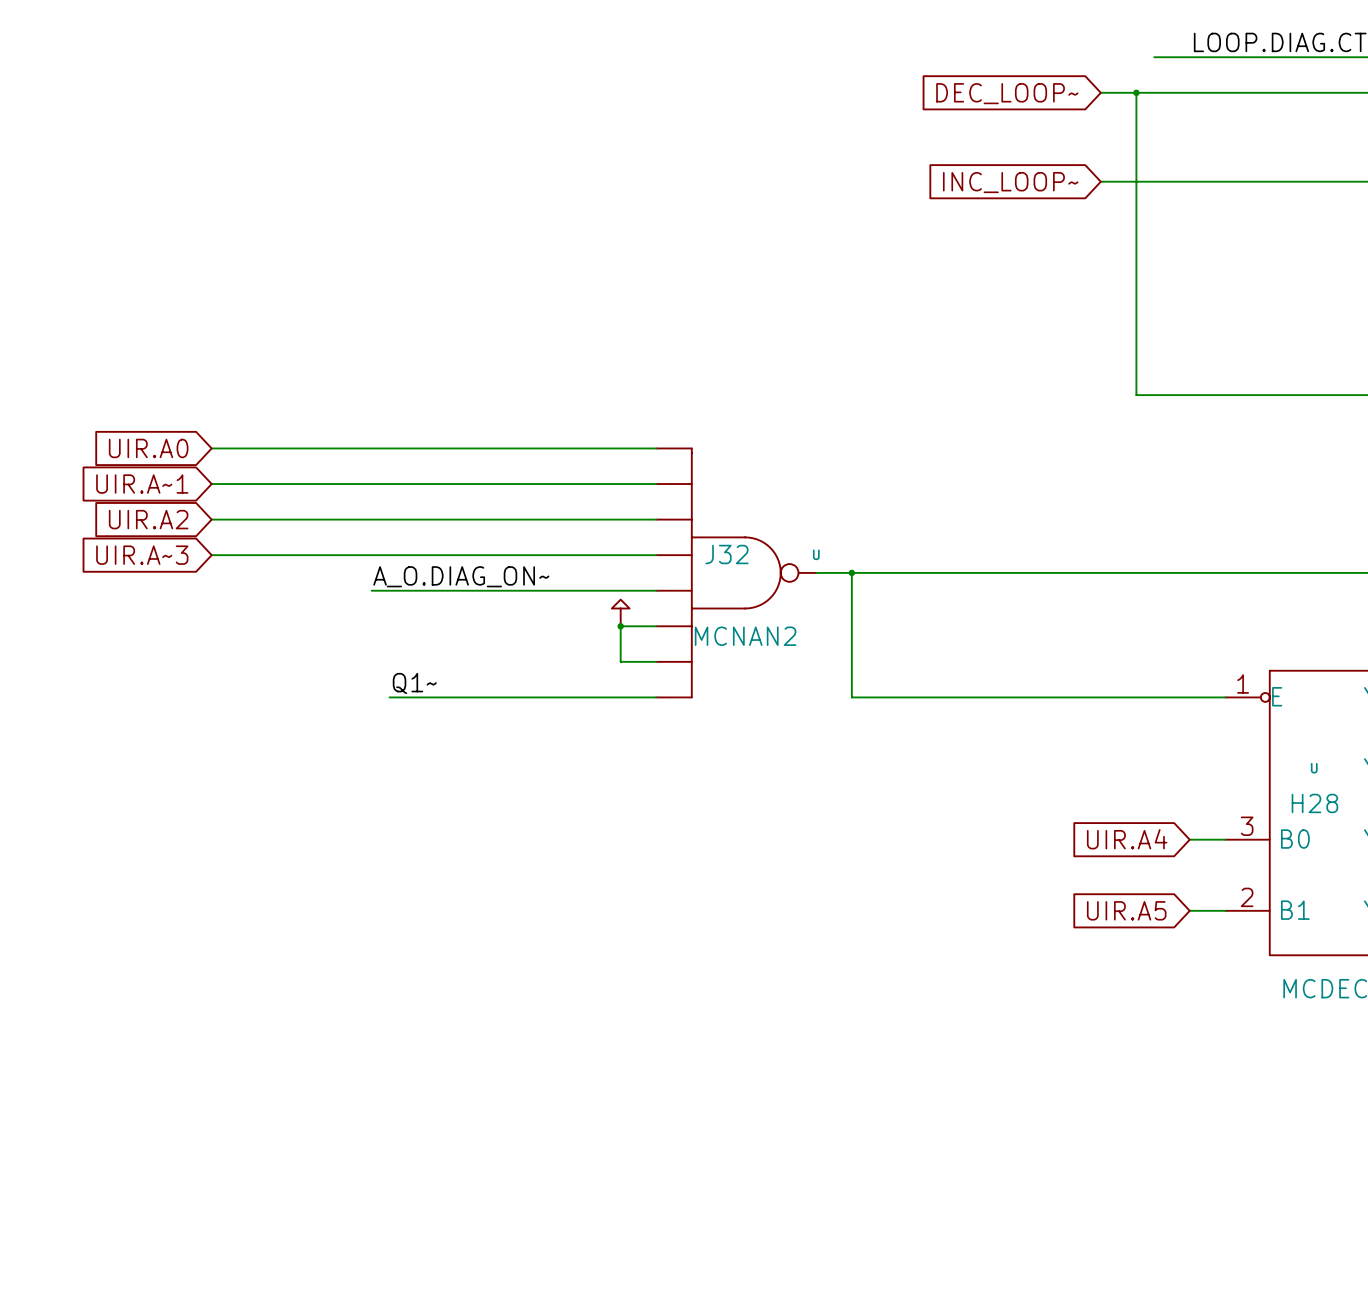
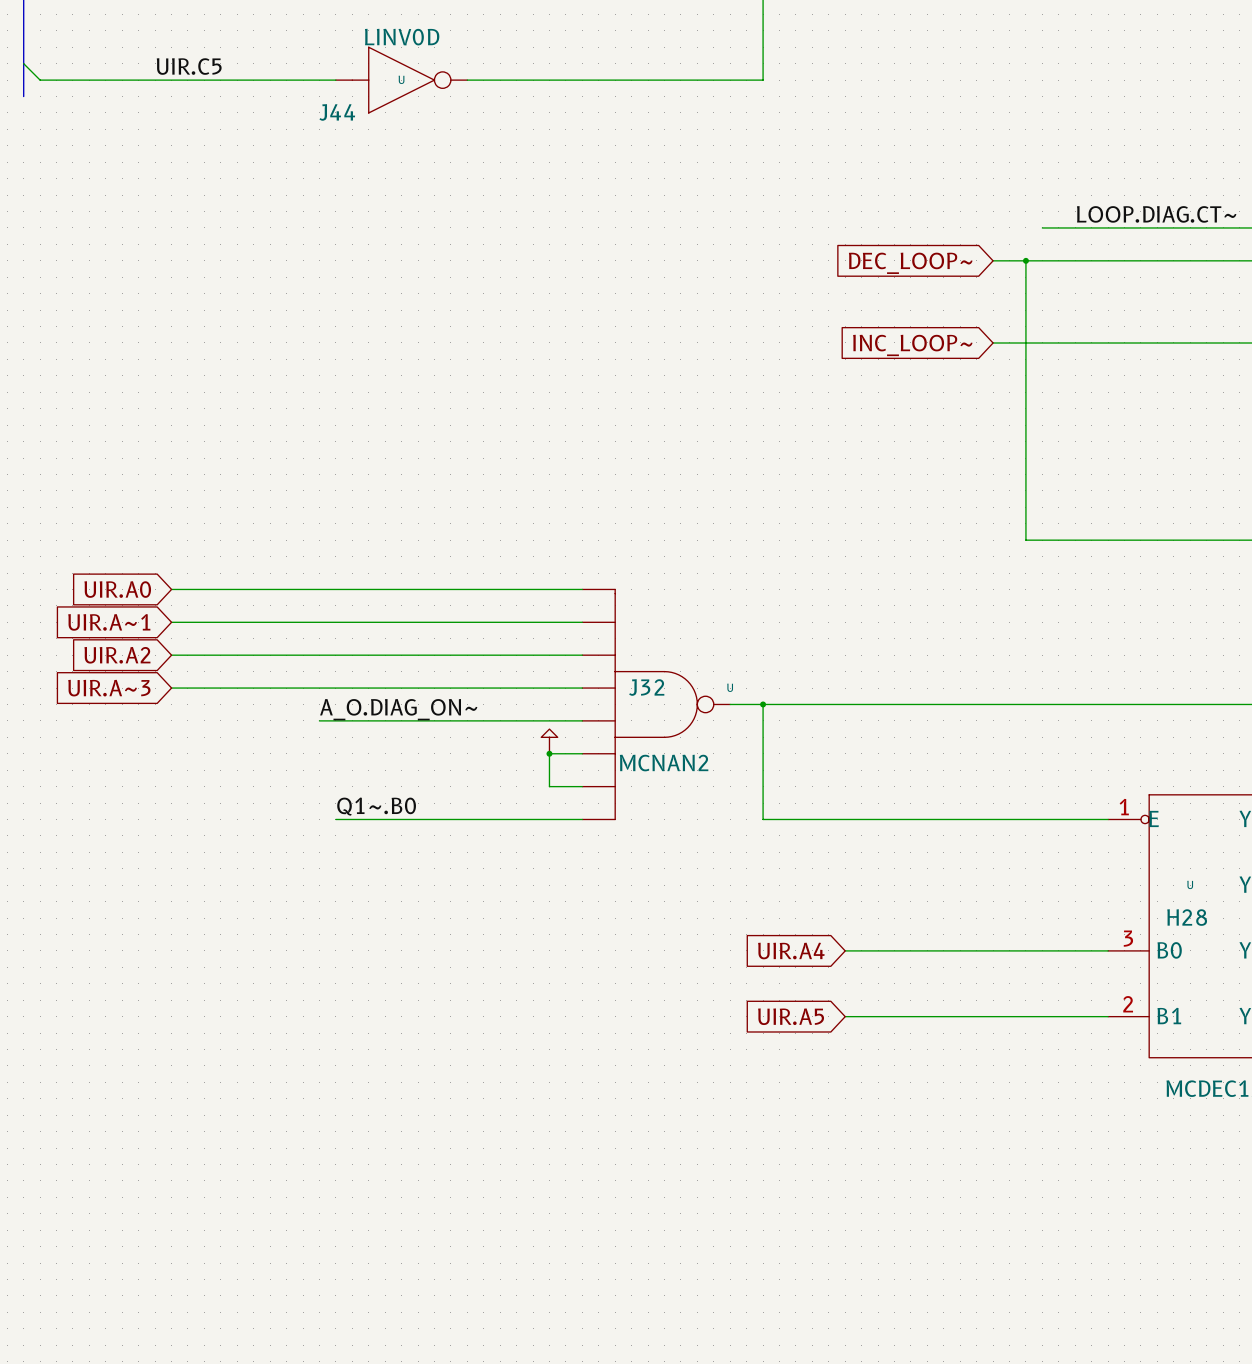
label: Q1~ (414, 683) -> Q1~.B0 (376, 806)
global label: none -> UIR.A4 (791, 951)
wire: none -> (845, 950) (1075, 950)
global label: UIR.A4 (1127, 839) -> none
global label: none -> UIR.A5 (791, 1016)
wire: none -> (845, 1016) (1075, 1016)
global label: UIR.A5 (1126, 910) -> none

